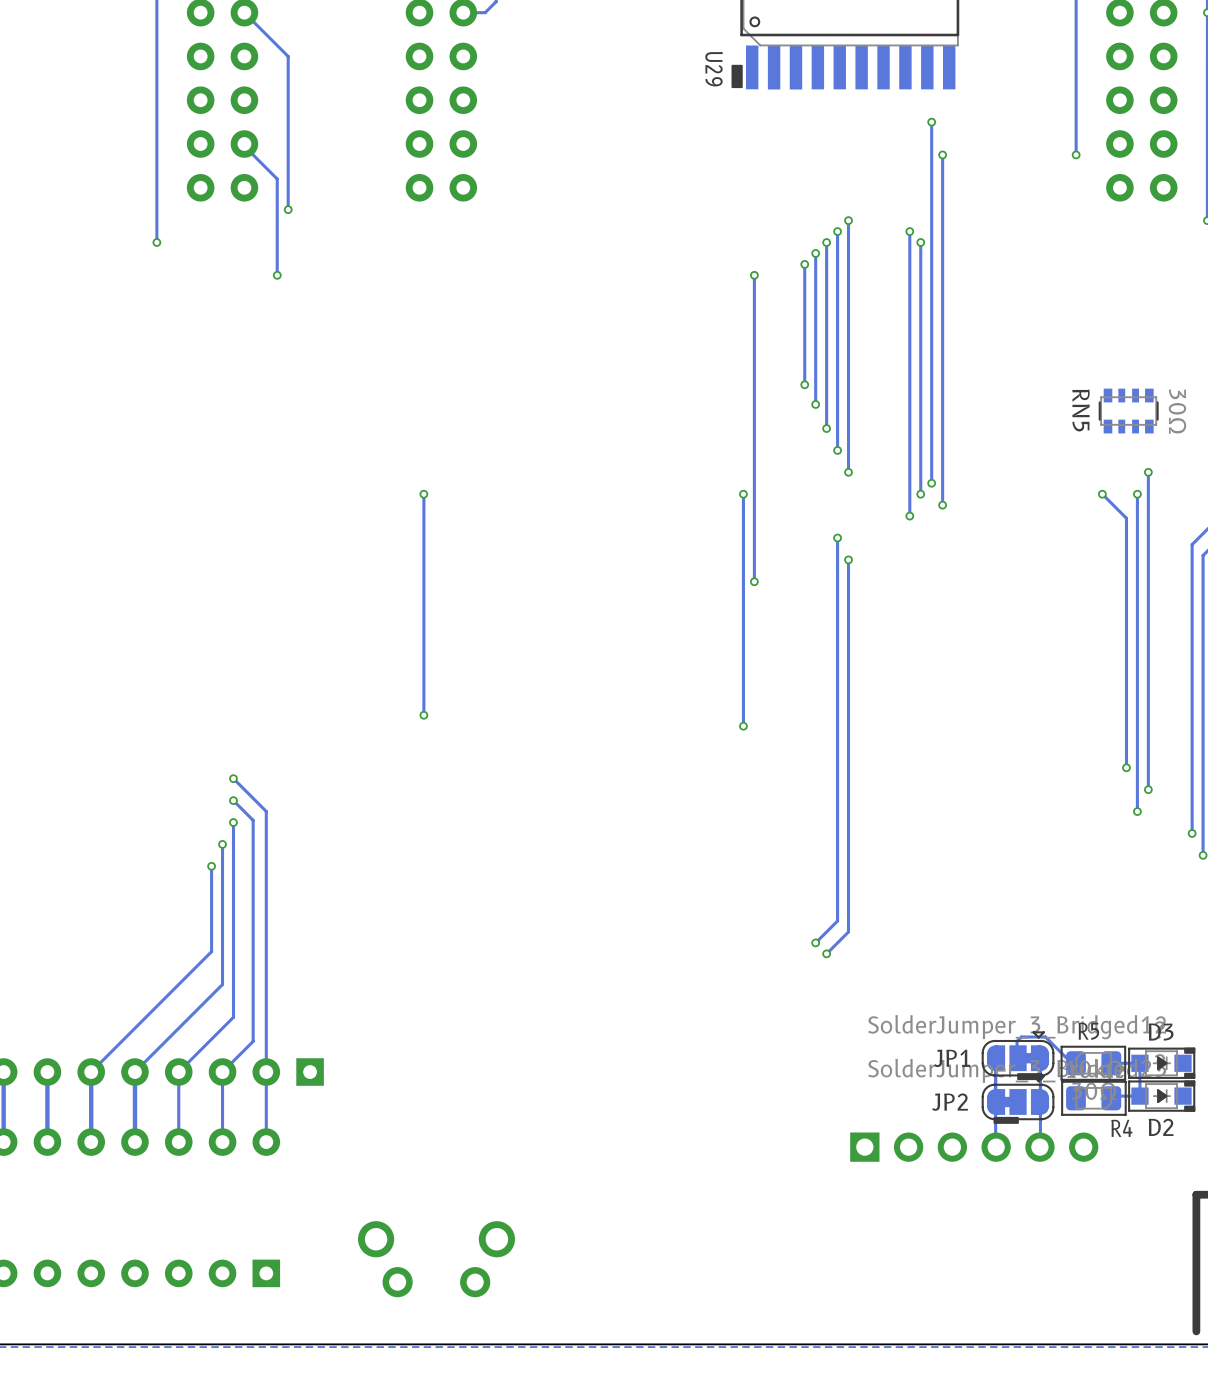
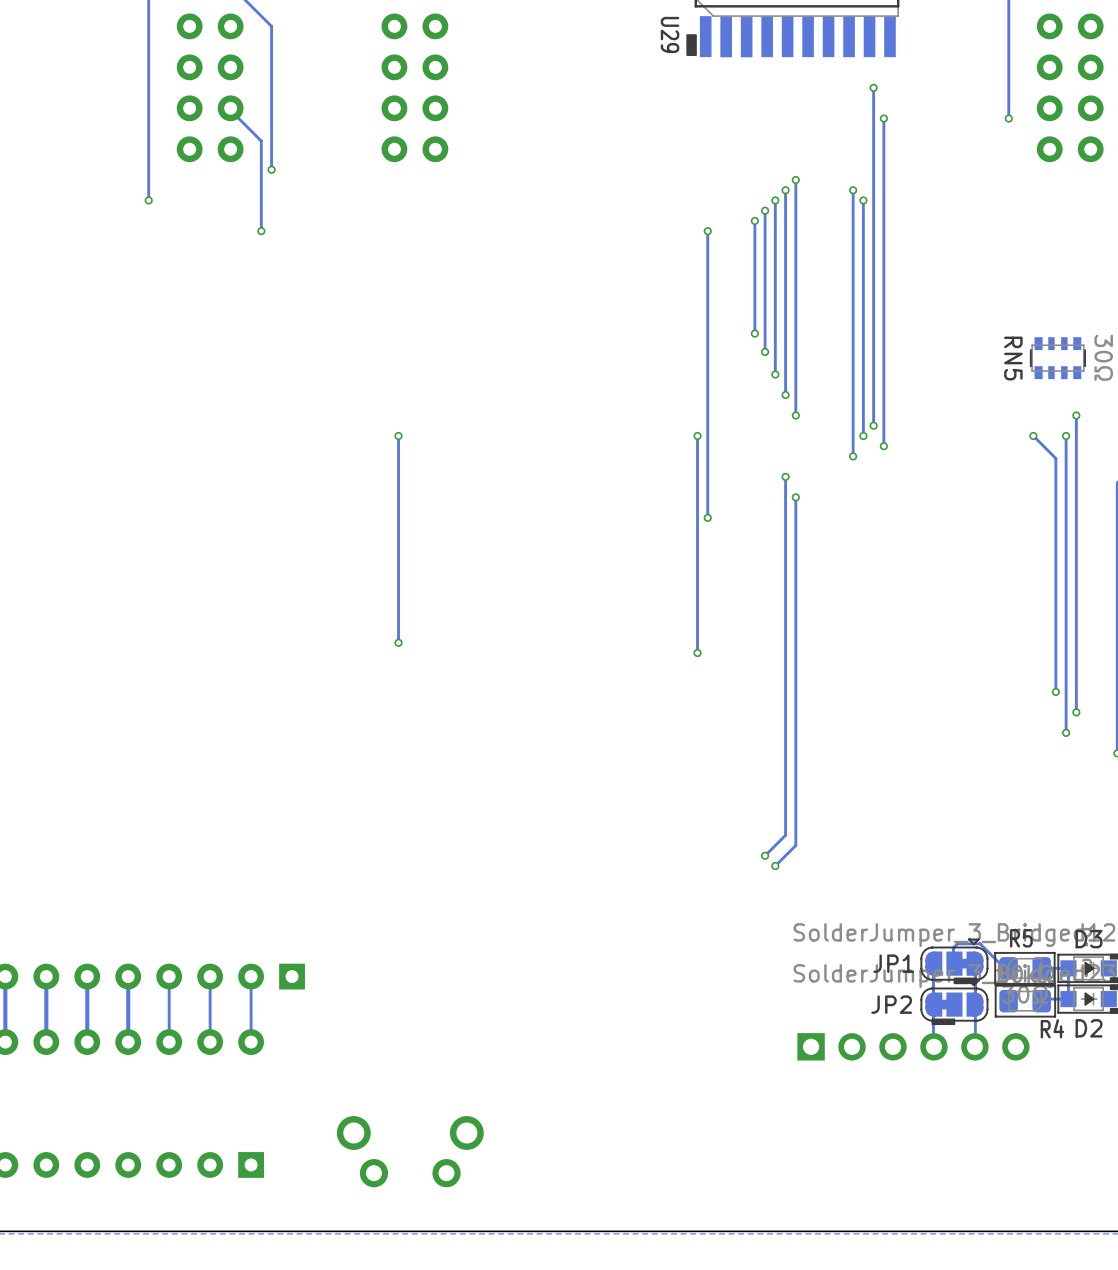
track: (233, 778) (266, 811) (266, 1072) -> none
via: (233, 778) -> none
track: (233, 800) (253, 820) (253, 1041) (222, 1072) -> none
via: (233, 800) -> none
track: (233, 822) (233, 1017) (178, 1072) -> none
via: (233, 822) -> none
track: (222, 844) (222, 984) (134, 1072) -> none
via: (222, 844) -> none
track: (211, 866) (211, 951) (91, 1072) -> none
via: (211, 866) -> none

